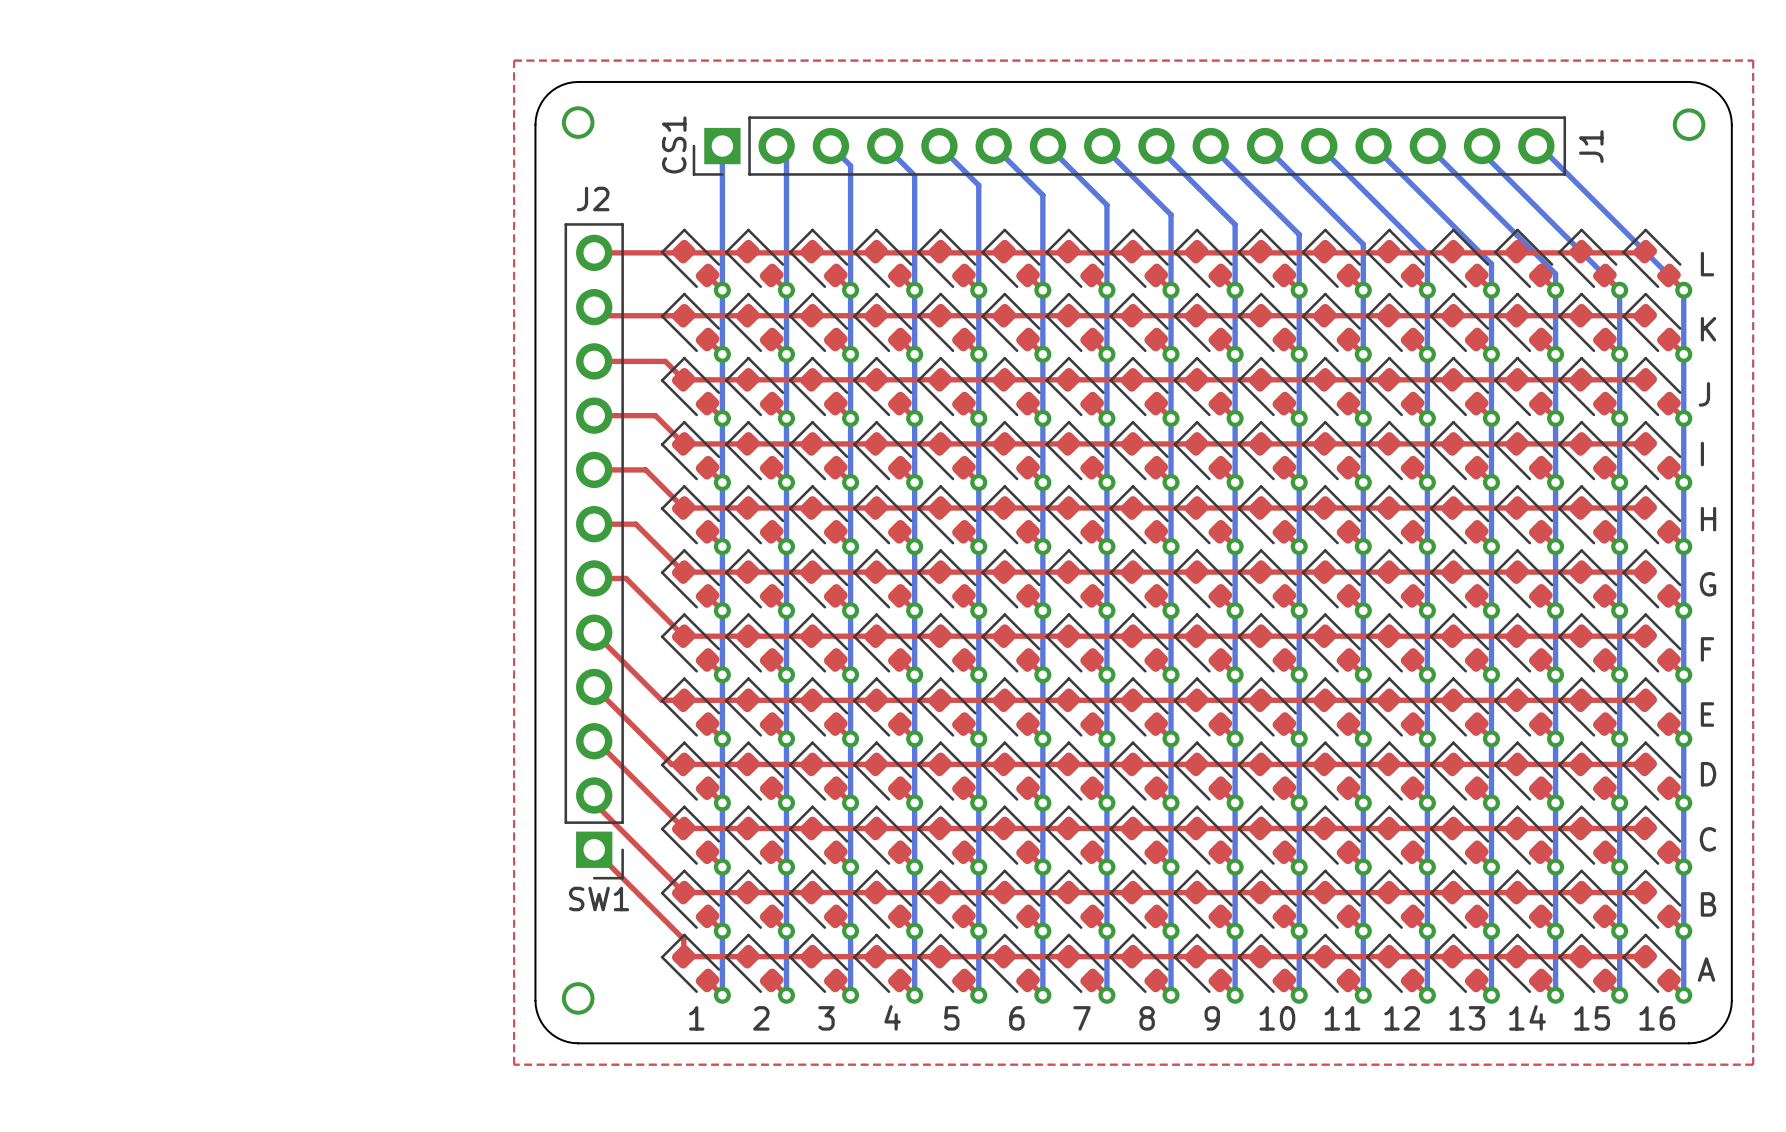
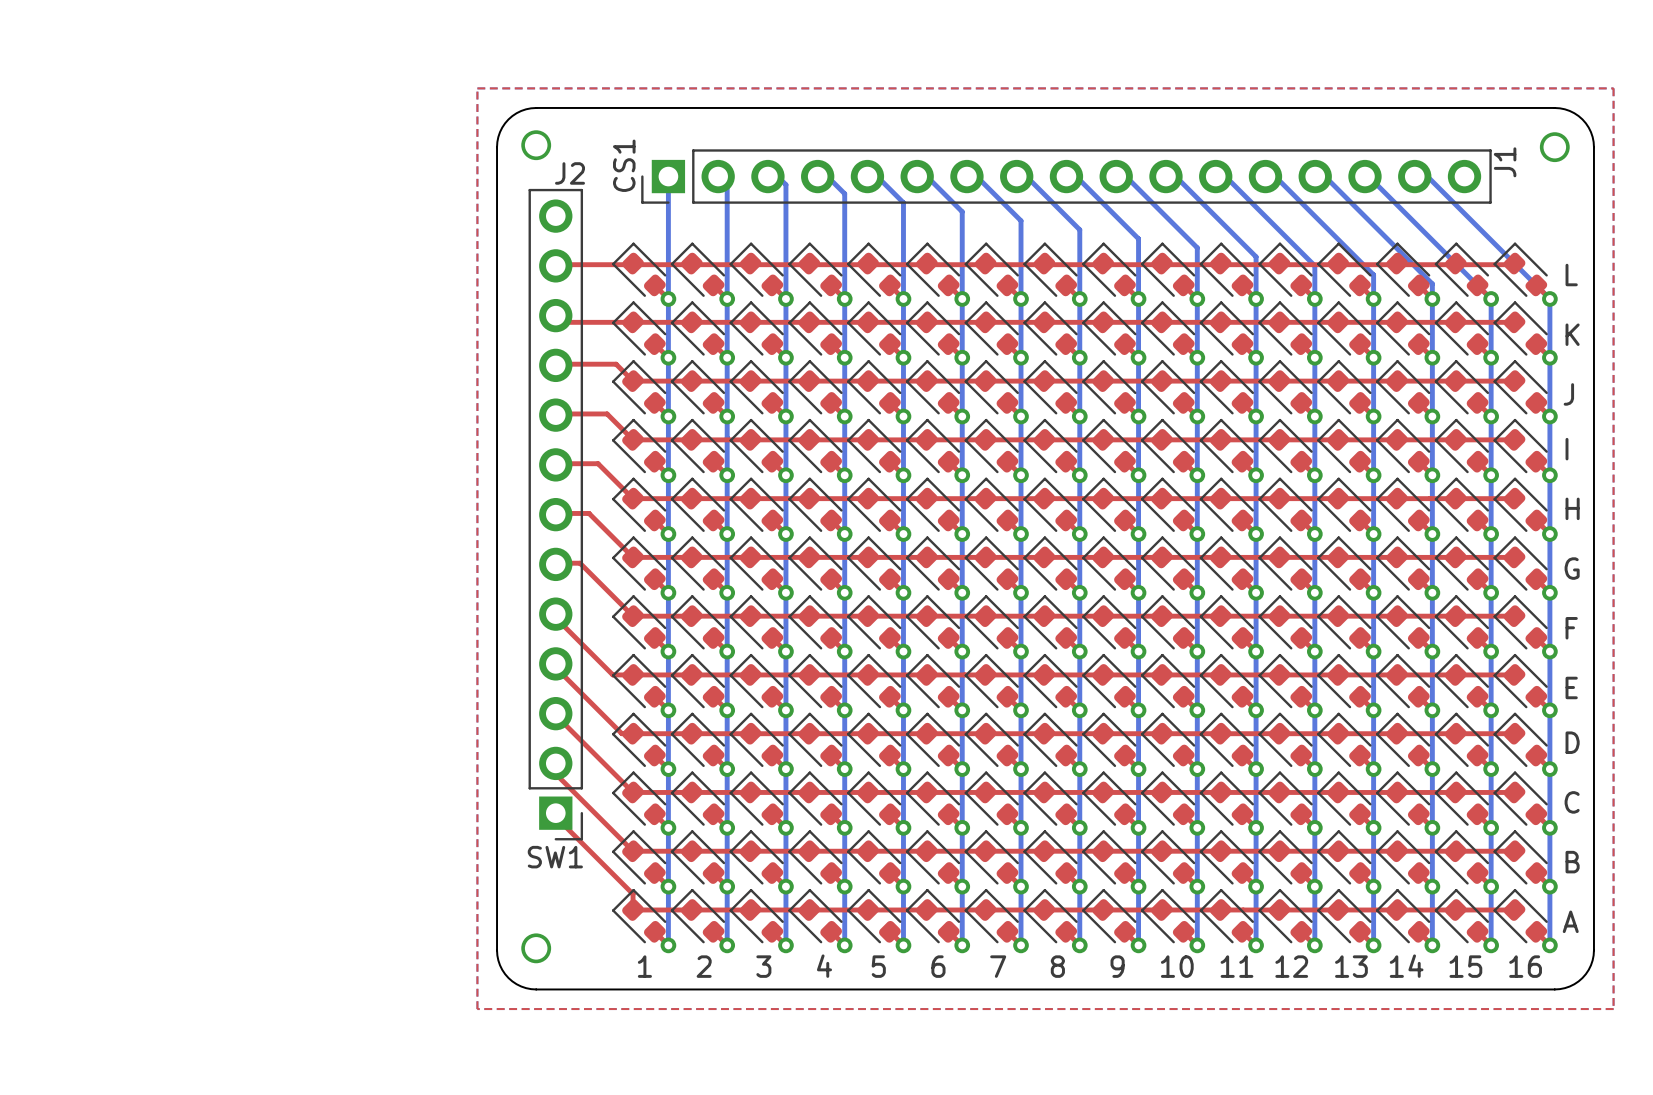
J1 footprint: [692, 116, 1567, 176] -> [641, 149, 1492, 204]
J2 footprint: [564, 223, 624, 880] -> [528, 188, 584, 841]

